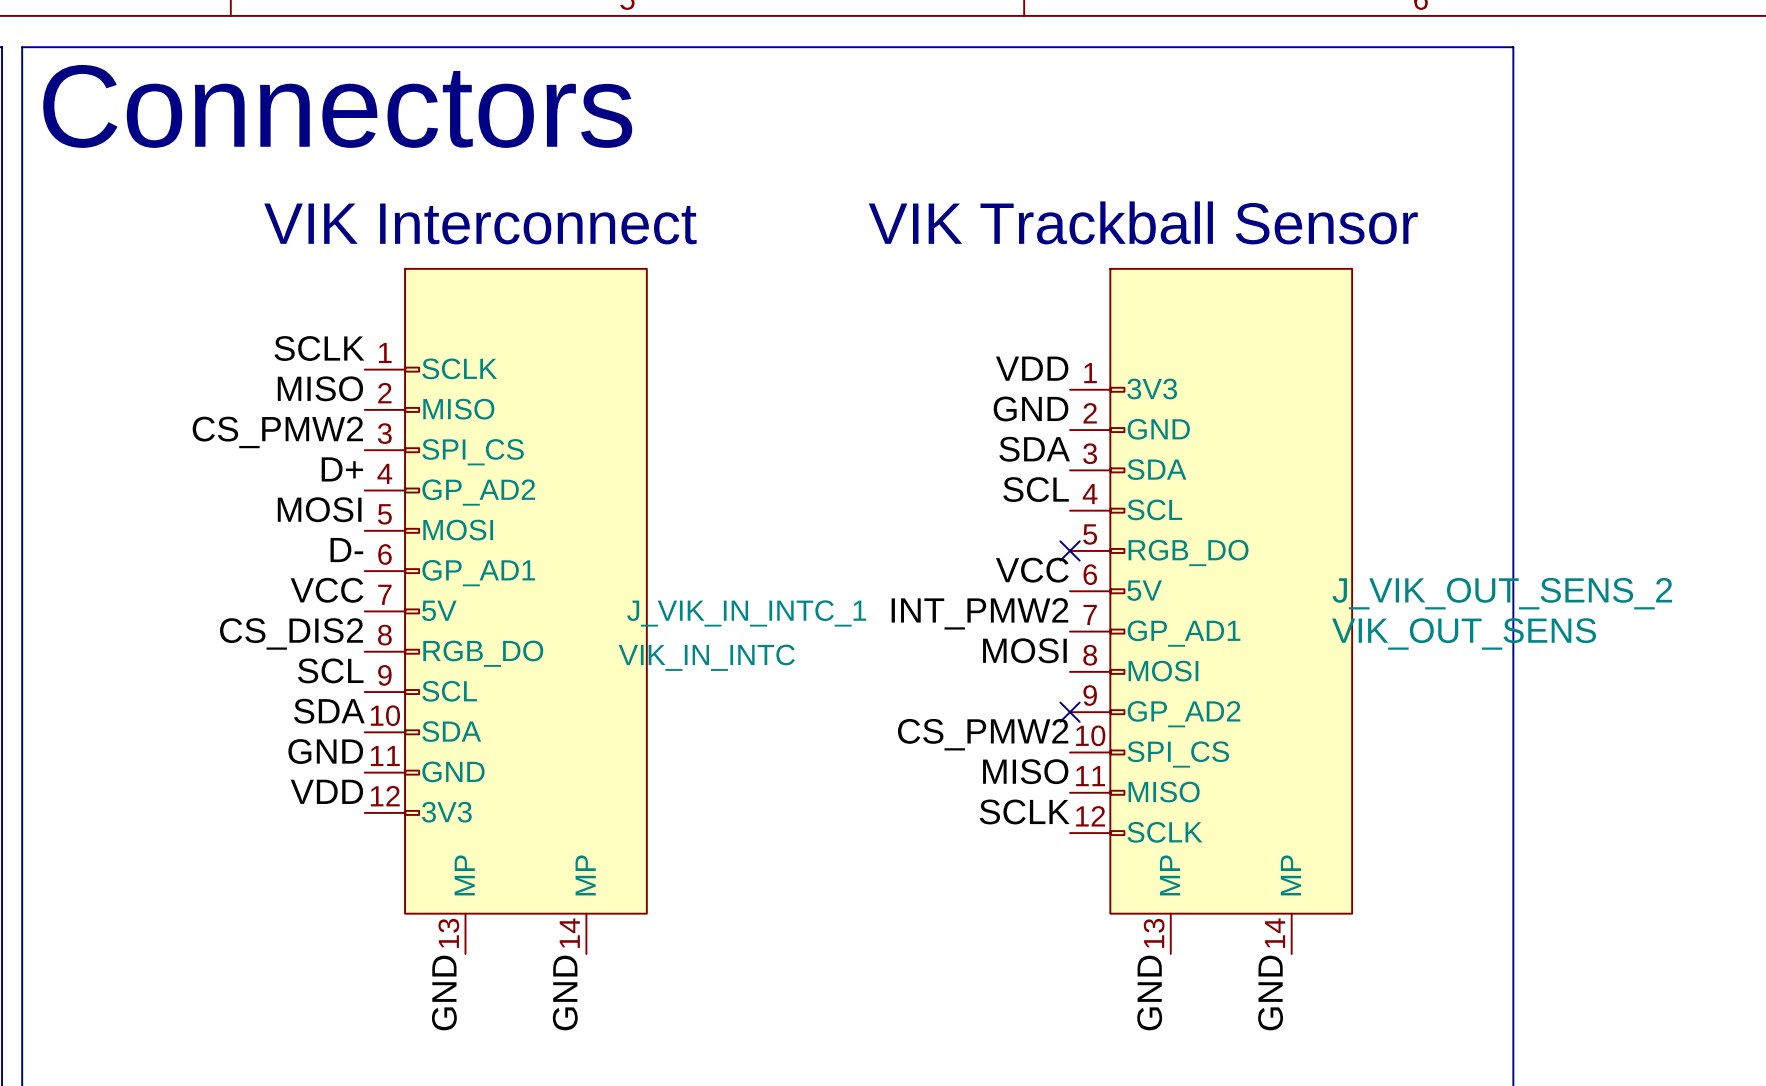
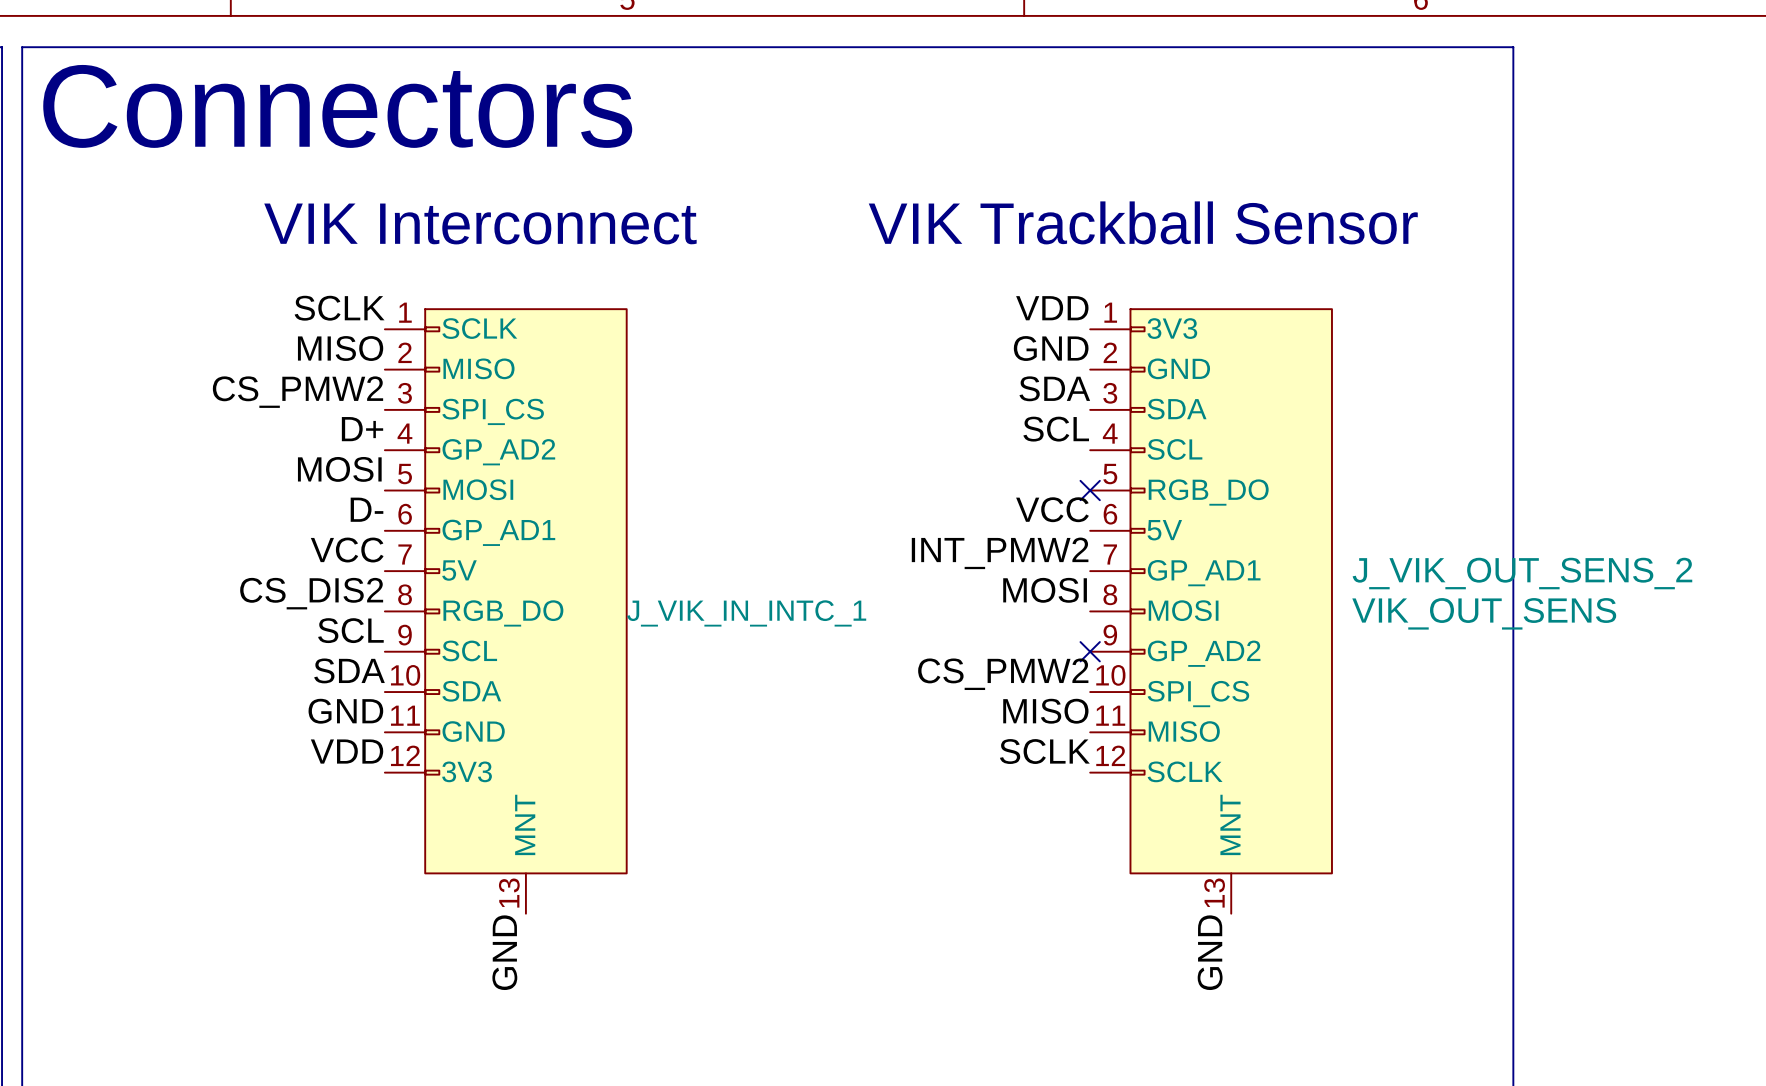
J_VIK_IN_INTC_1 symbol: [364, 268, 647, 954] -> [384, 309, 627, 914]
J_VIK_OUT_SENS_2 symbol: [1070, 268, 1353, 954] -> [1090, 309, 1332, 914]
label position: SCLK (319, 348) -> SCLK (339, 308)
label position: VDD (1032, 368) -> VDD (1052, 308)
label position: MISO (320, 388) -> MISO (340, 348)
label position: GND (1031, 408) -> GND (1051, 348)
label position: CS_PMW2 (277, 432) -> CS_PMW2 (297, 392)
label position: SDA (1034, 449) -> SDA (1054, 388)
label position: D+ (342, 469) -> D+ (362, 429)
label position: SCL (1036, 489) -> SCL (1056, 429)
no-connect mark: none -> (1090, 490)
label position: MOSI (319, 509) -> MOSI (339, 469)
label position: D- (346, 550) -> D- (367, 509)
no-connect mark: (1070, 550) -> none
label position: VCC (1032, 570) -> VCC (1052, 509)
label position: VCC (327, 590) -> VCC (347, 550)
label position: INT_PMW2 (979, 613) -> INT_PMW2 (1000, 553)
label position: CS_DIS2 (291, 633) -> CS_DIS2 (311, 593)
label position: MOSI (1024, 650) -> MOSI (1045, 590)
no-connect mark: none -> (1090, 651)
J_VIK_IN_INTC_1 text: VIK_IN_INTC (706, 657) -> none
label position: SCL (330, 670) -> SCL (350, 630)
label position: SDA (329, 711) -> SDA (349, 670)
no-connect mark: (1070, 712) -> none
label position: CS_PMW2 (983, 734) -> CS_PMW2 (1003, 674)
label position: GND (325, 751) -> GND (345, 711)
label position: MISO (1025, 771) -> MISO (1045, 711)
label position: VDD (326, 791) -> VDD (347, 751)
label position: SCLK (1024, 811) -> SCLK (1044, 751)
label: none -> GND (504, 952)
label: none -> GND (1210, 952)
label: GND (444, 993) -> none
label: GND (565, 993) -> none
label: GND (1149, 993) -> none
label: GND (1270, 993) -> none

